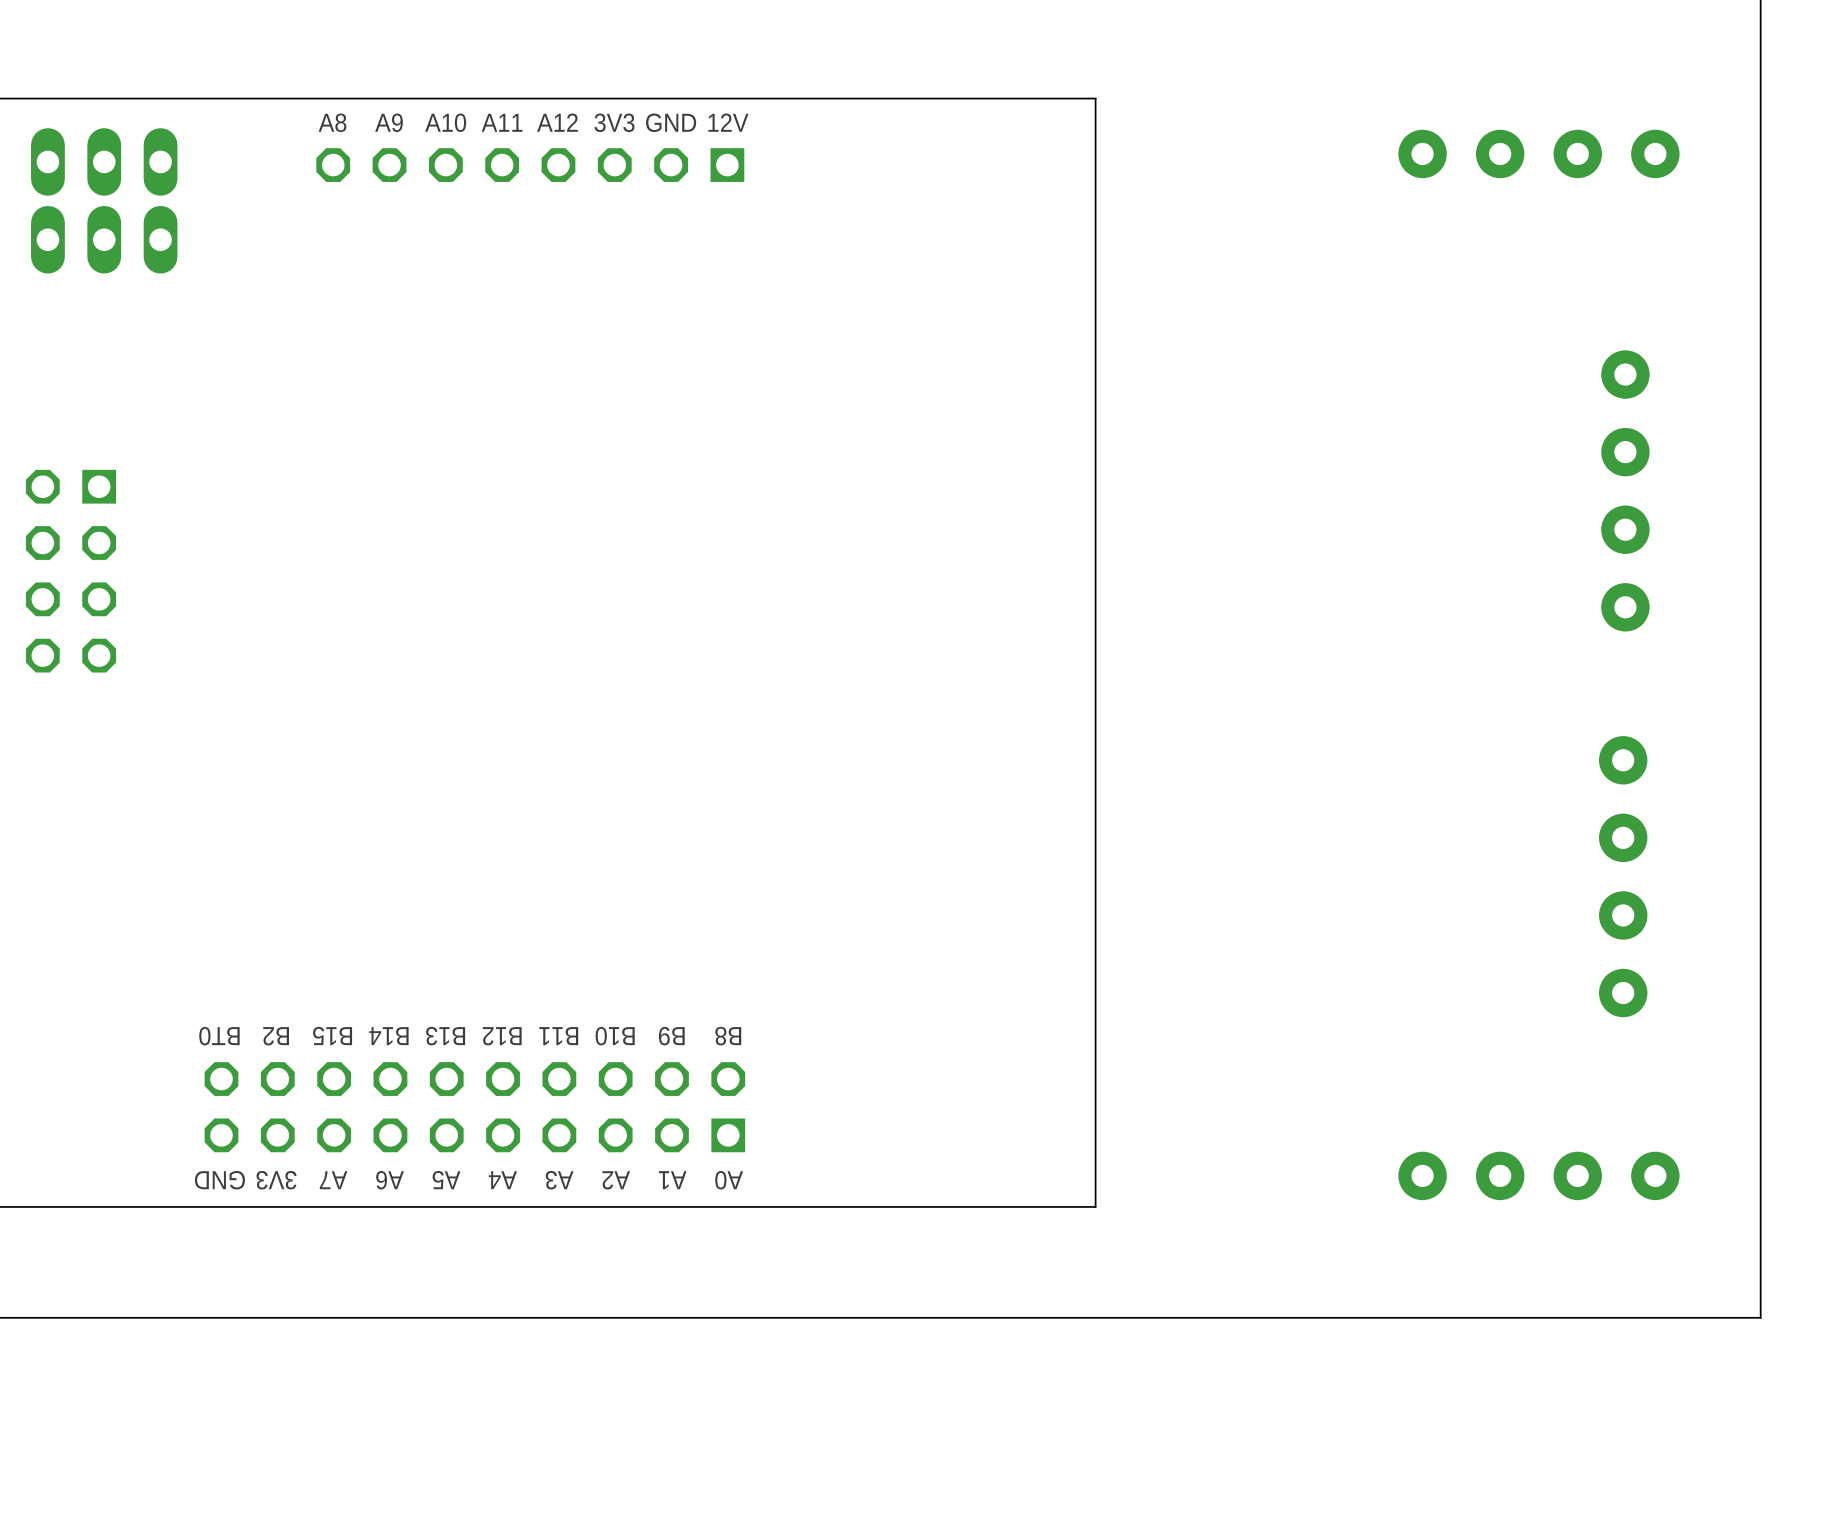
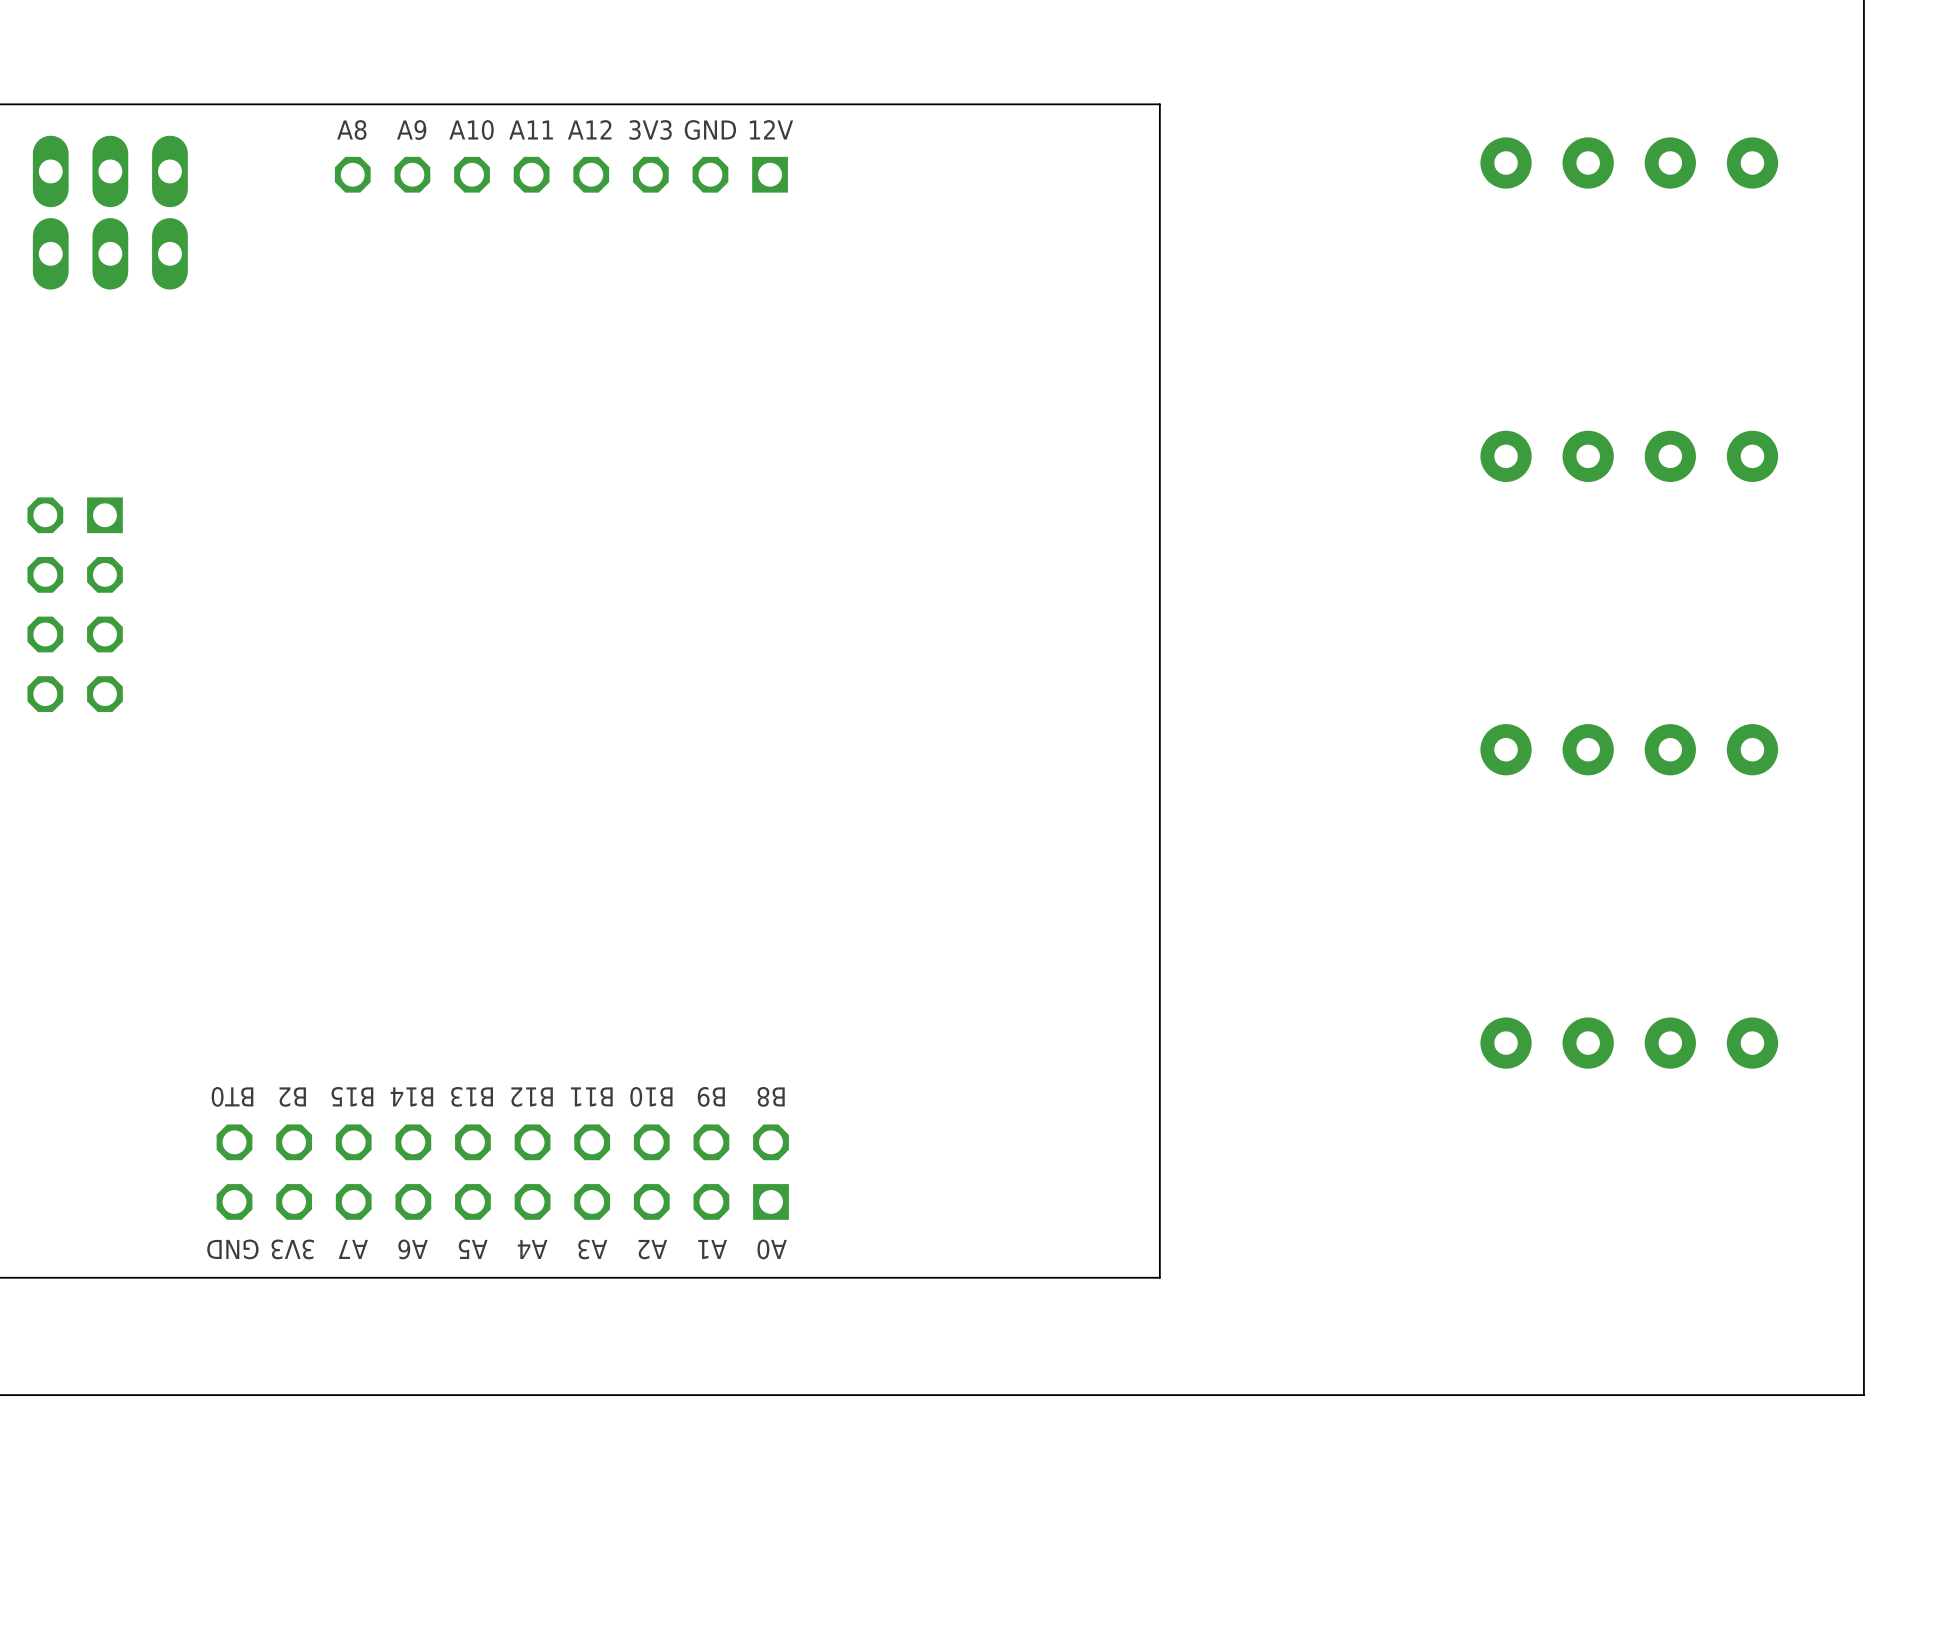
part rotation: 0° (1625, 490) -> 90° clockwise (1629, 456)
part: none -> (1629, 749)
part: (1623, 876) -> none
part: none -> (1629, 1043)
part: (1538, 1175) -> none

